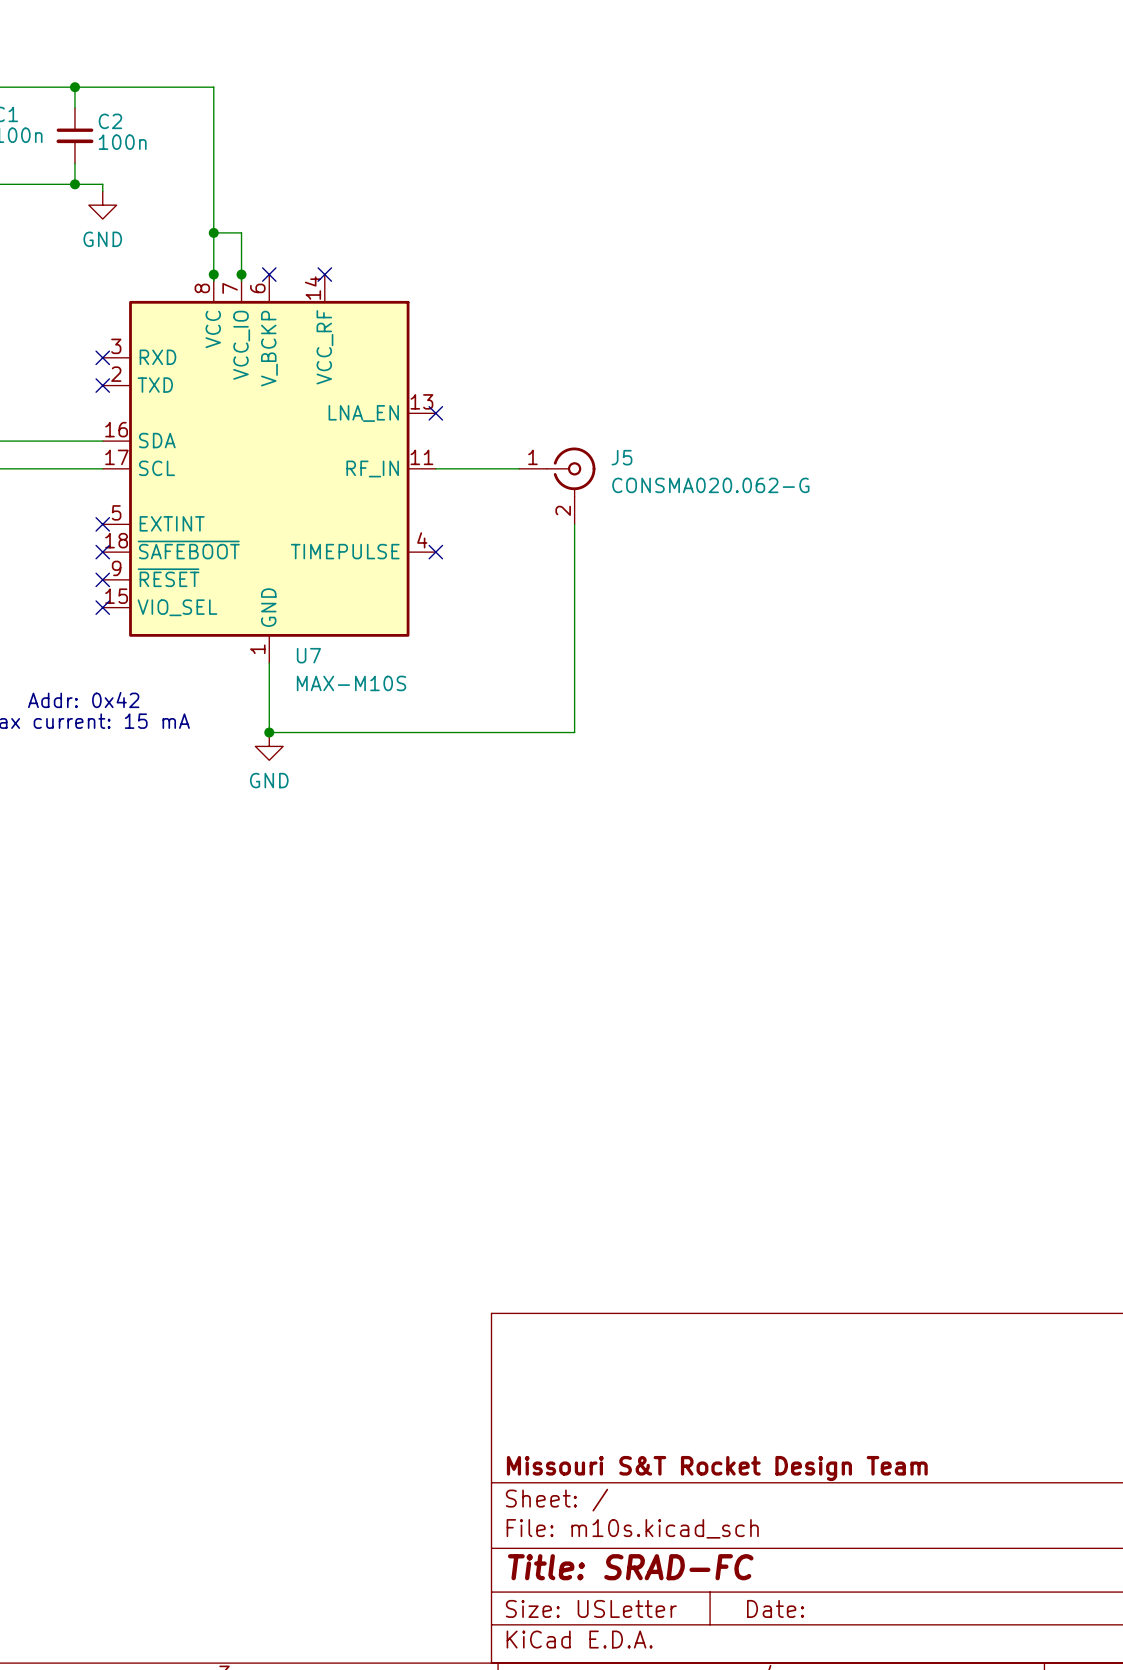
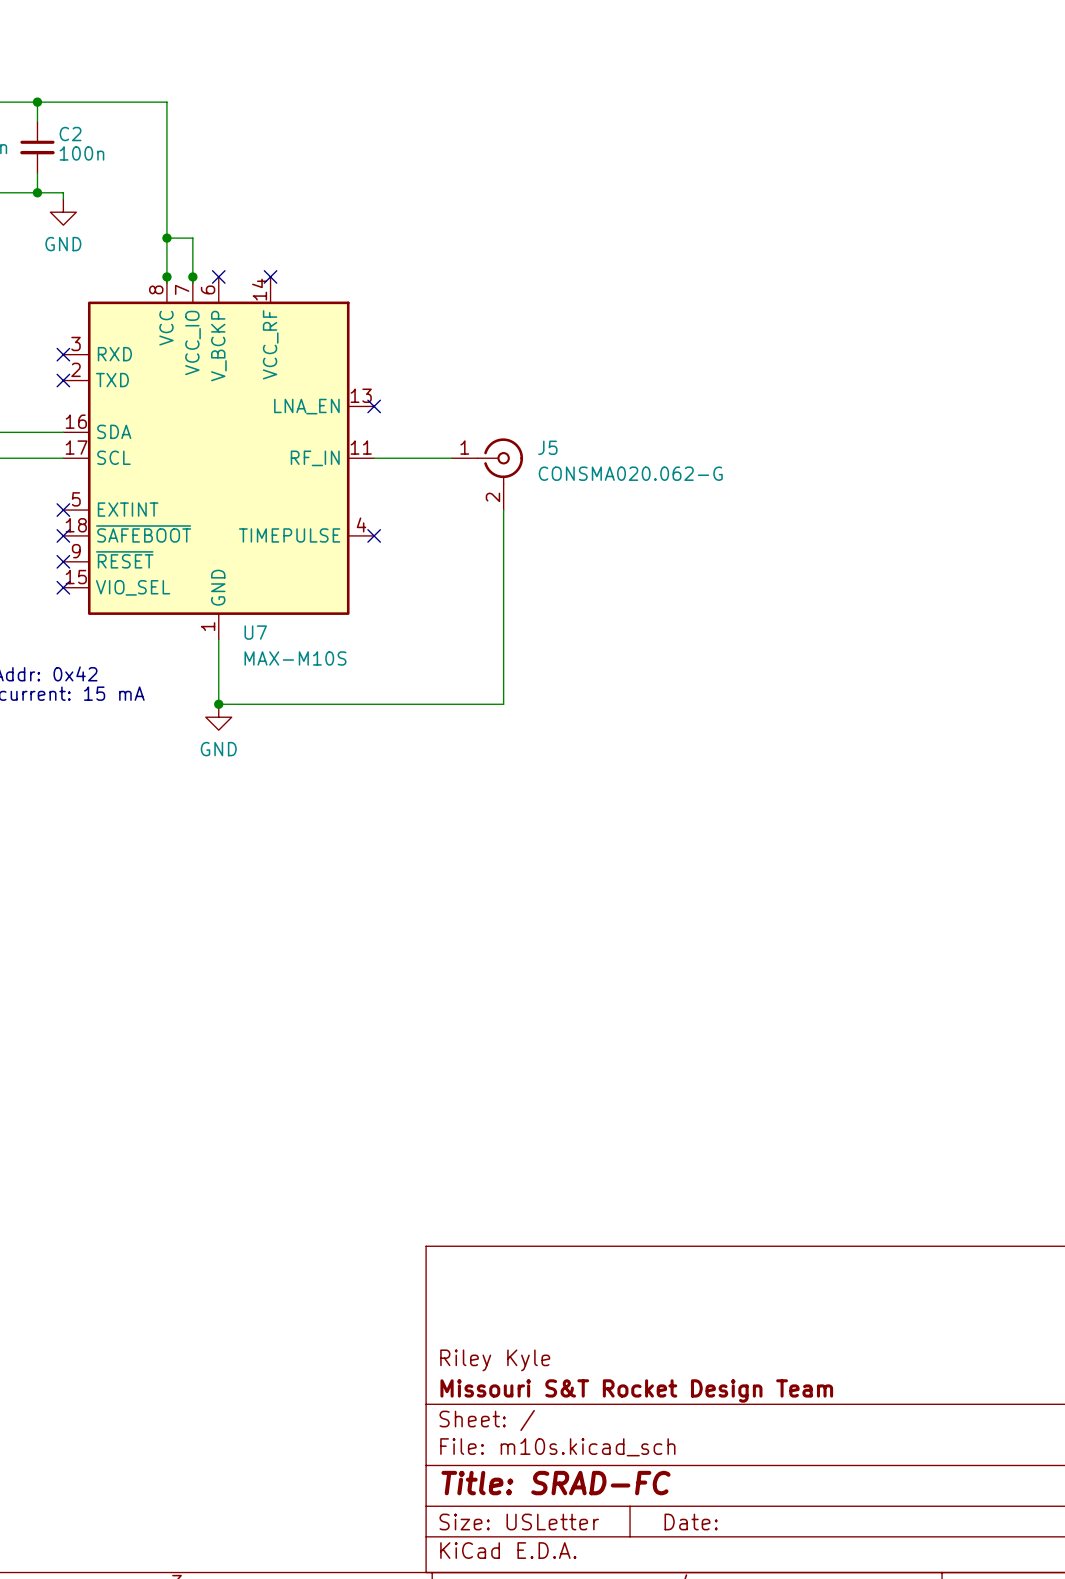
title block: none -> Riley Kyle (495, 1360)

